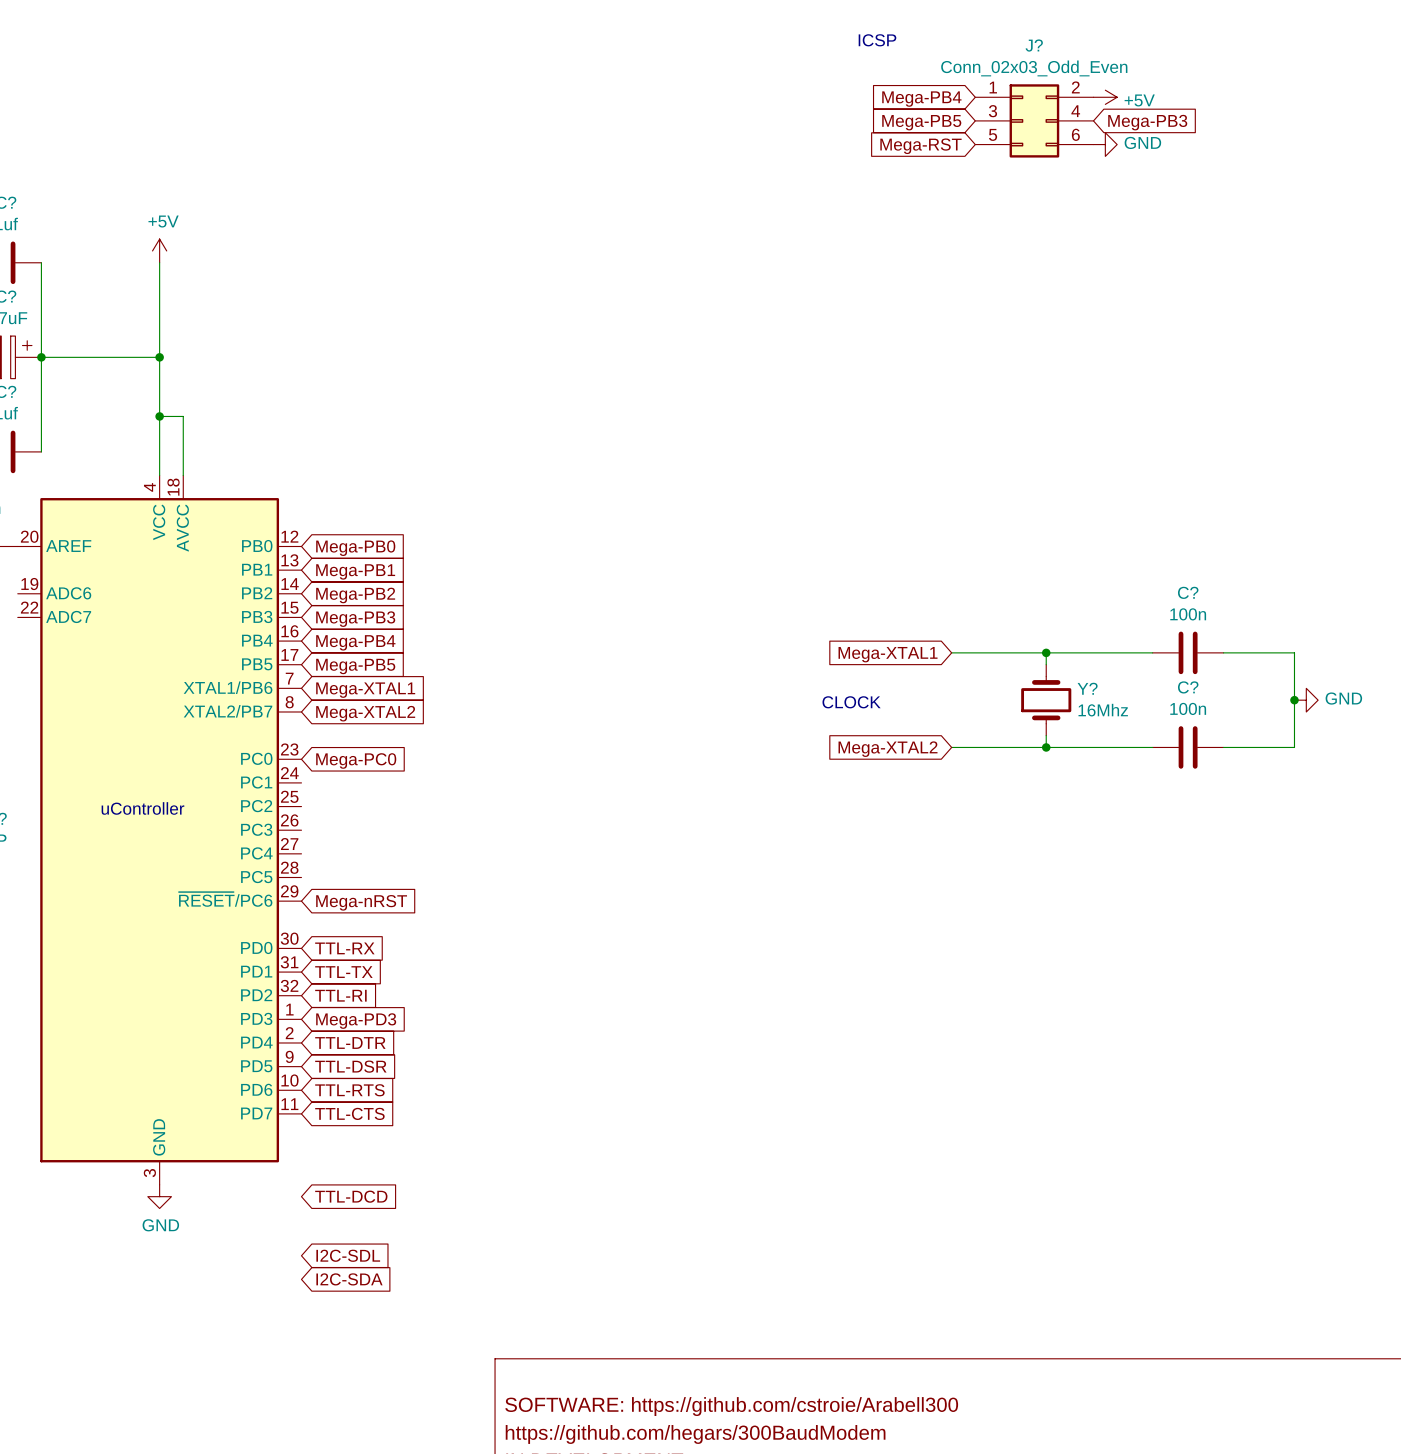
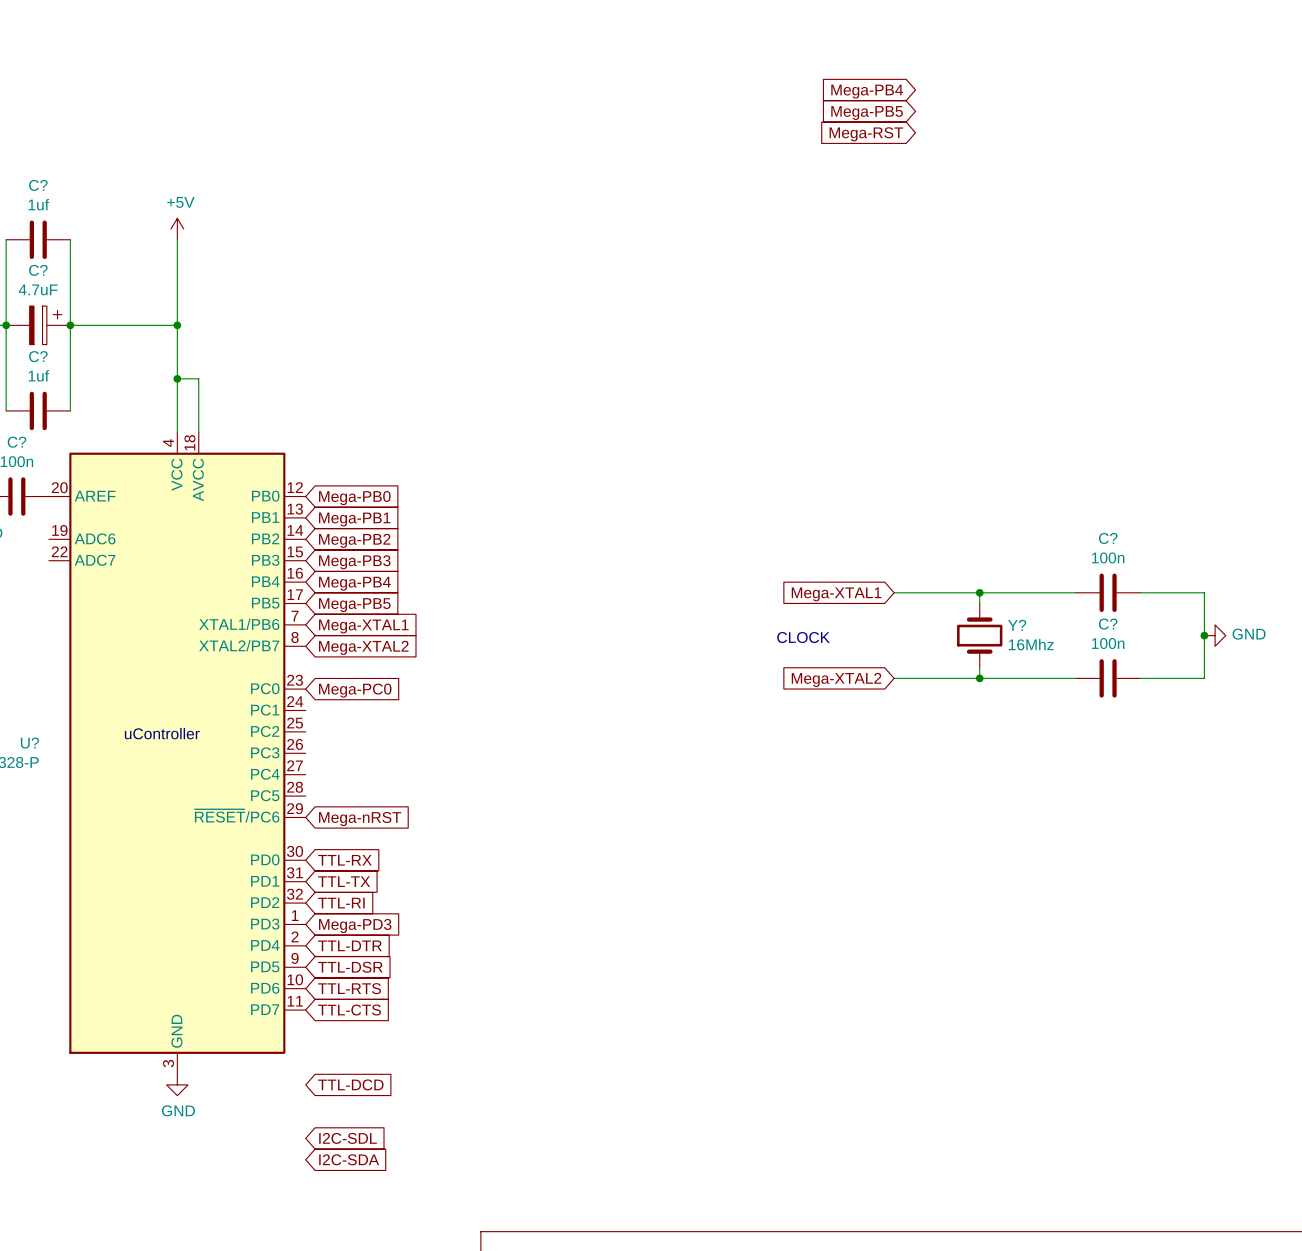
text: ICSP (877, 40) -> none
power symbol: +5V (1105, 97) -> none
J?: Conn_02x03_Odd_Even (1034, 120) -> none
global label: Mega-PB3 (1147, 122) -> none
power symbol: GND (1105, 144) -> none

